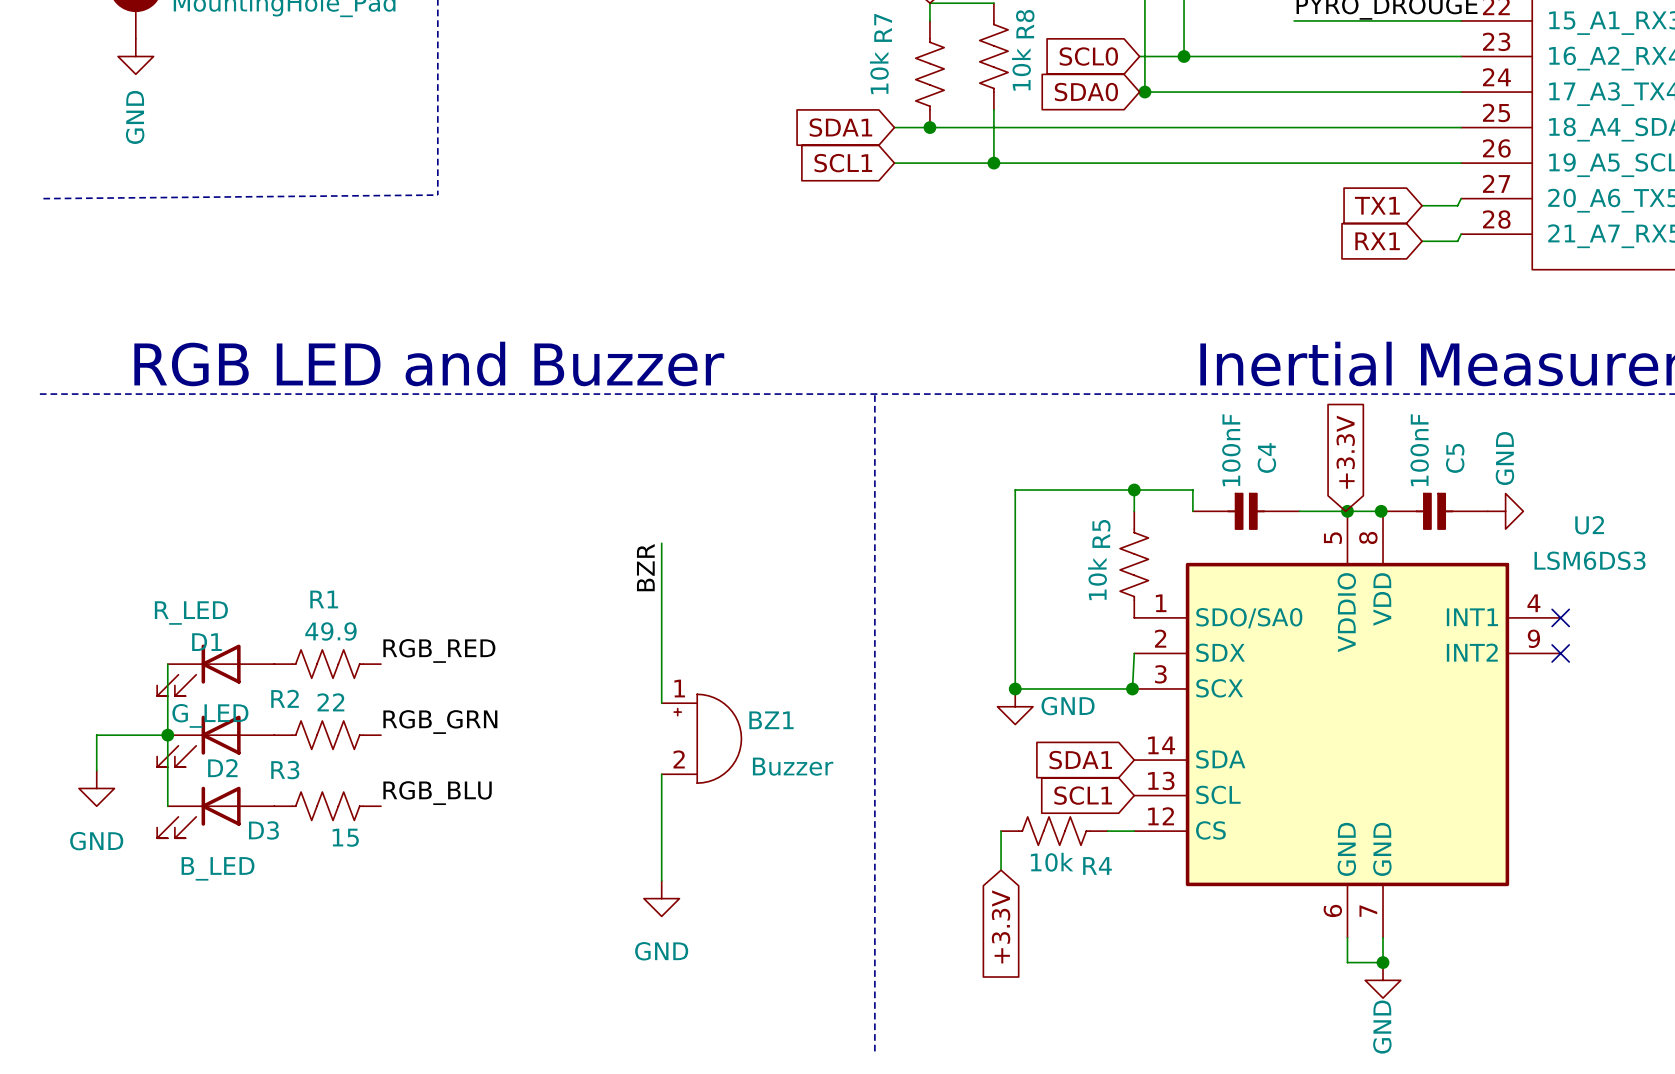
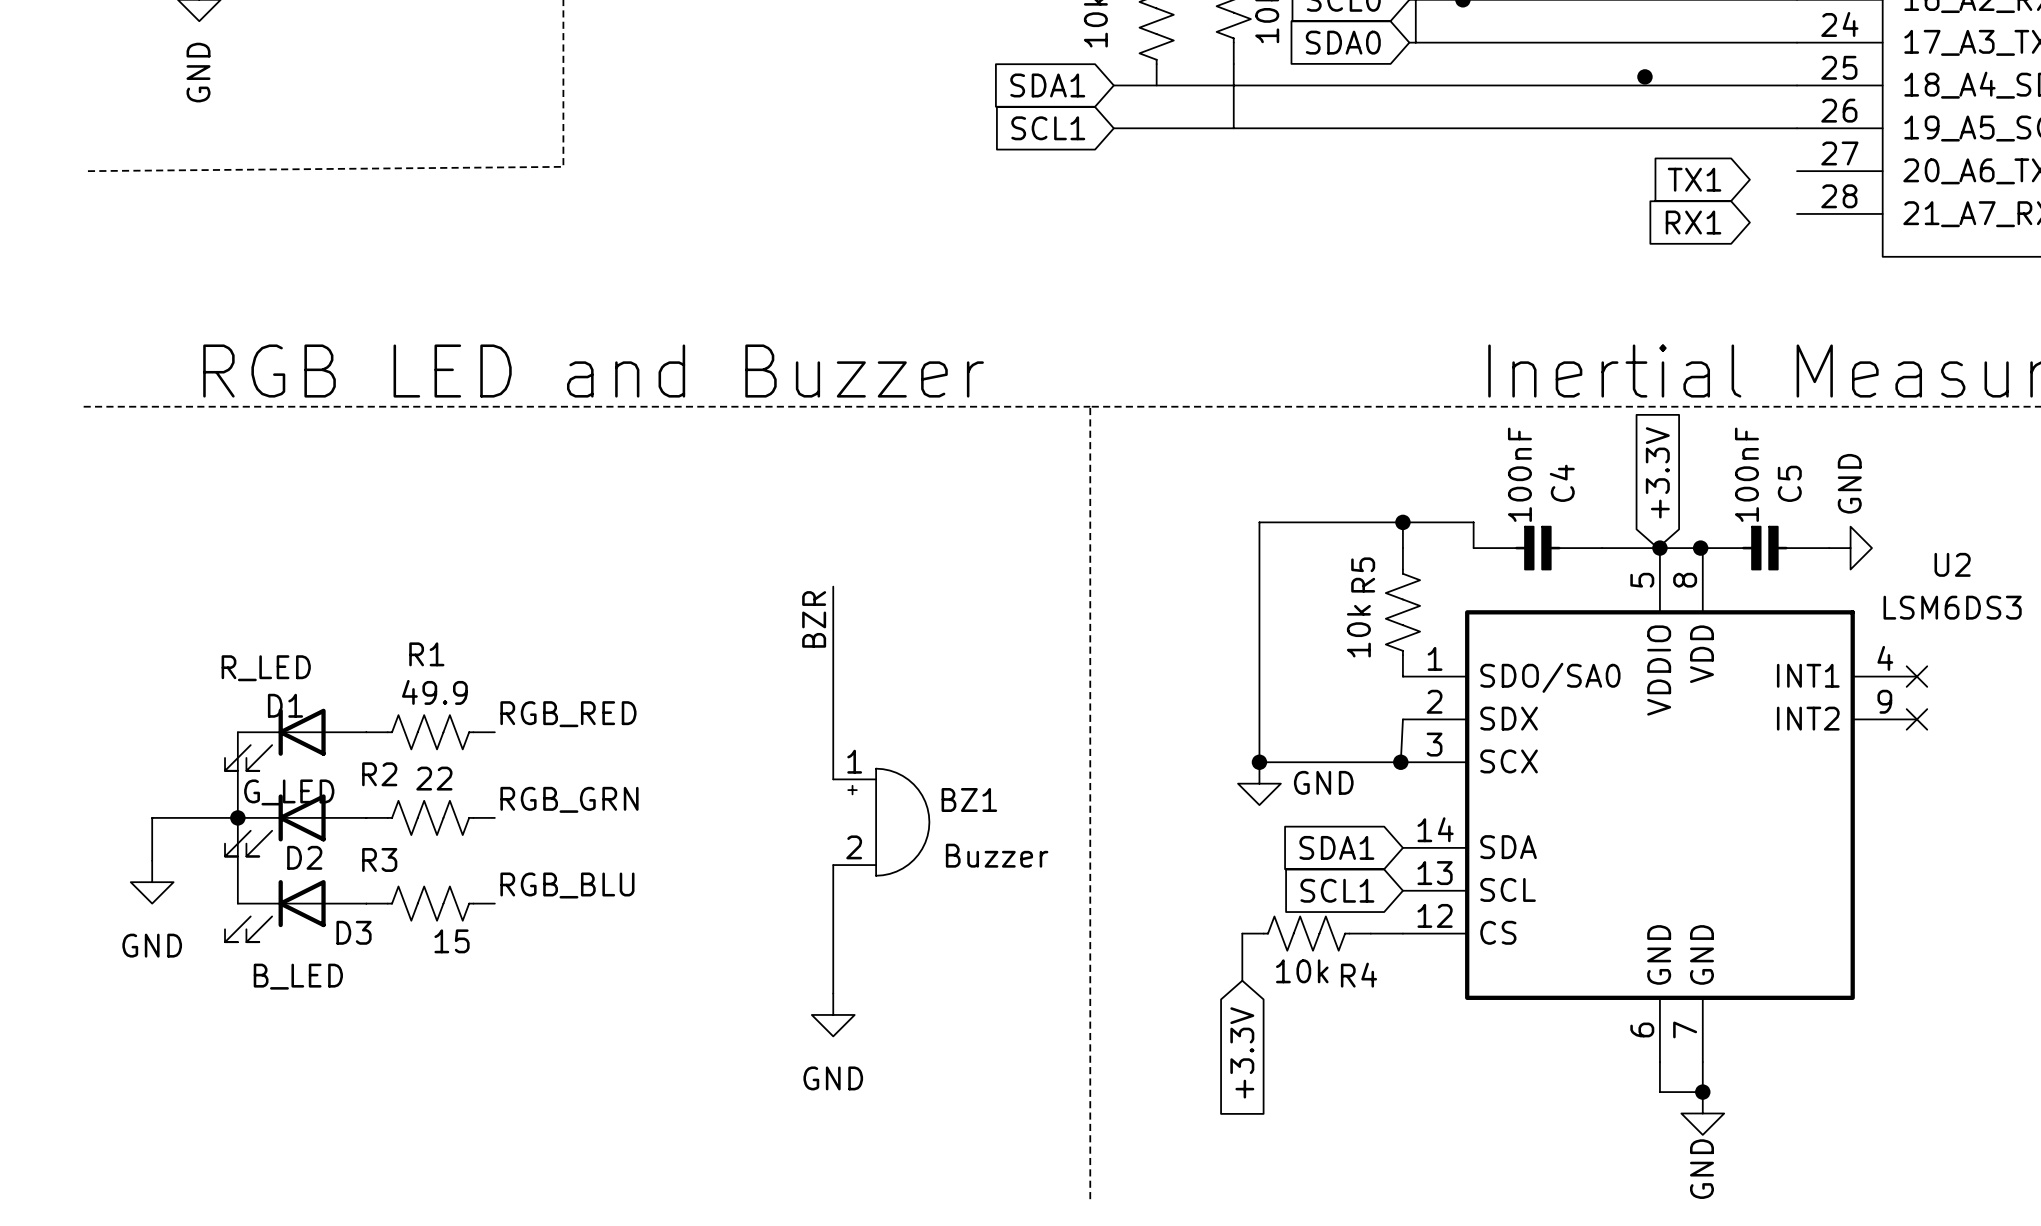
junction: (1144, 92) -> none
junction: none -> (1644, 76)
junction: (929, 127) -> none
junction: (993, 163) -> none
wire: (1461, 198) (1457, 205) (1422, 205) -> none
wire: (1461, 234) (1457, 241) (1422, 241) -> none

